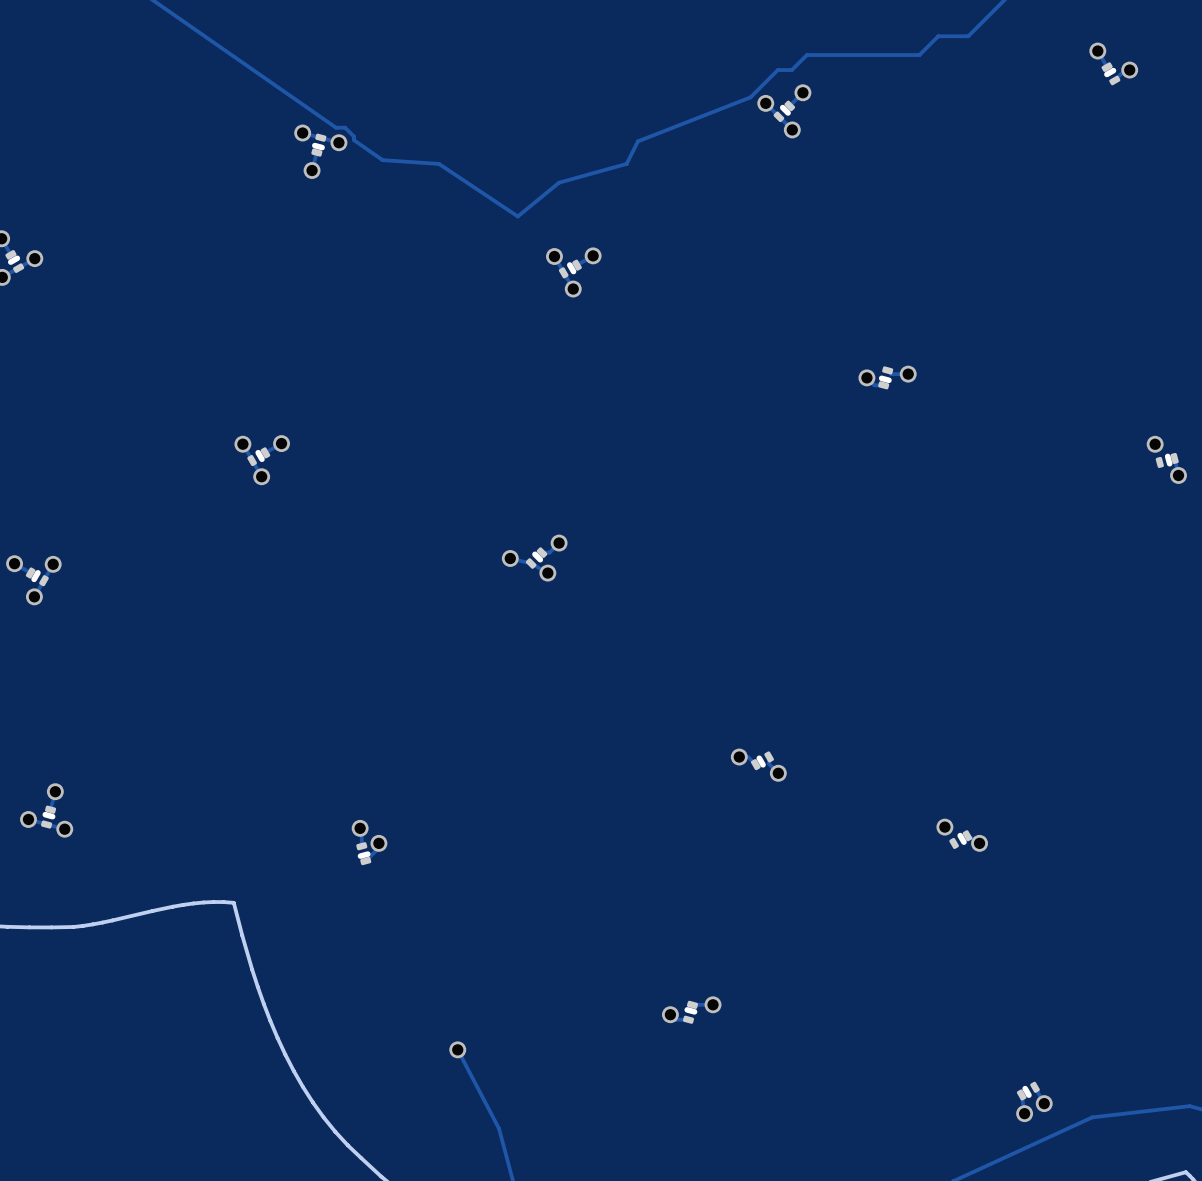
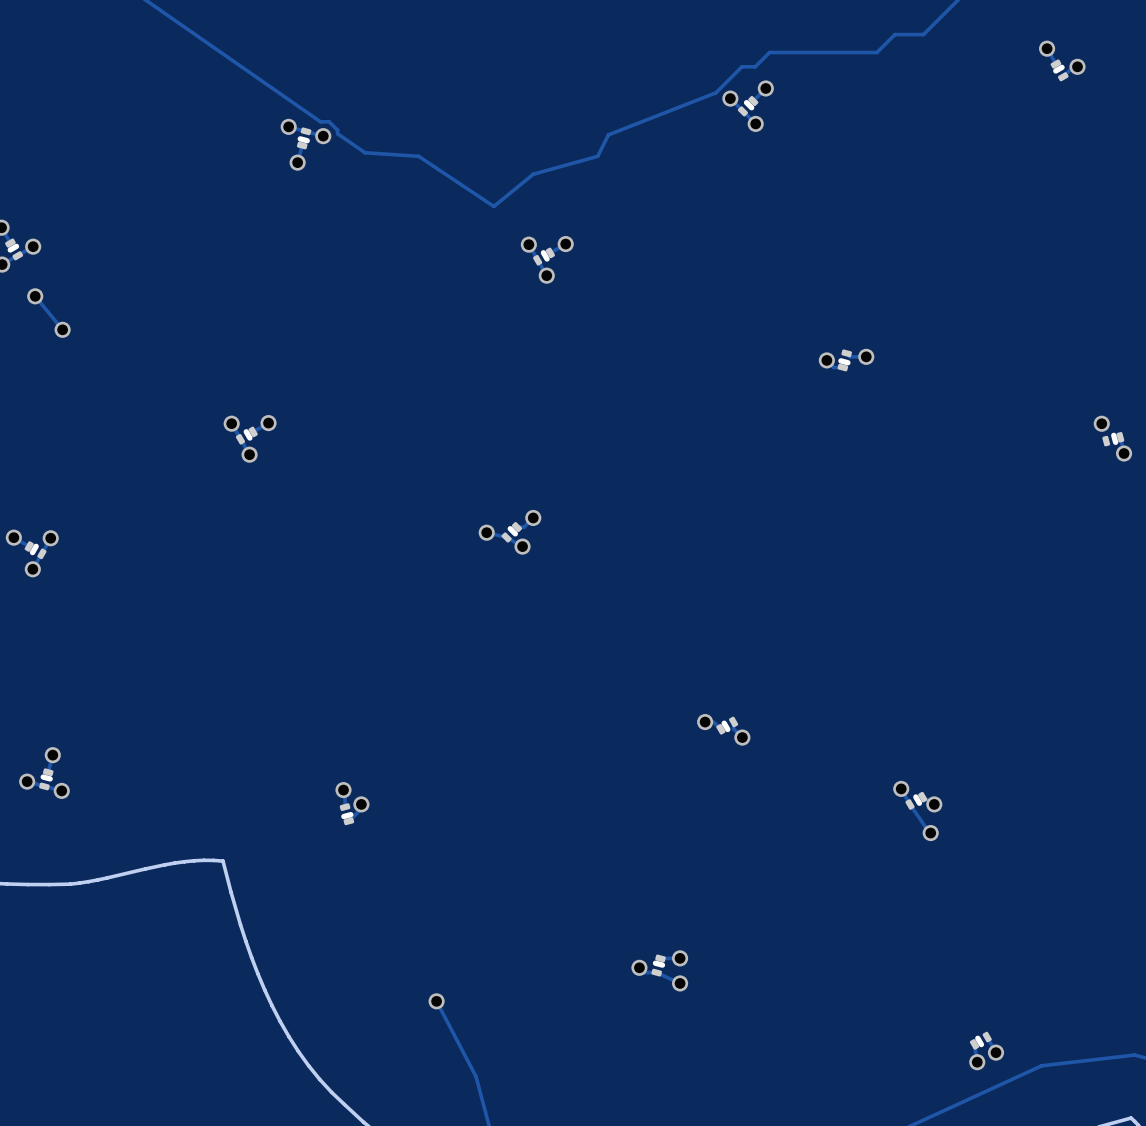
track: none -> (35, 296) (62, 329)
via: none -> (35, 296)
via: none -> (62, 329)
track: none -> (901, 788) (930, 833)
via: none -> (930, 833)
track: none -> (656, 972) (680, 983)
via: none -> (680, 983)

